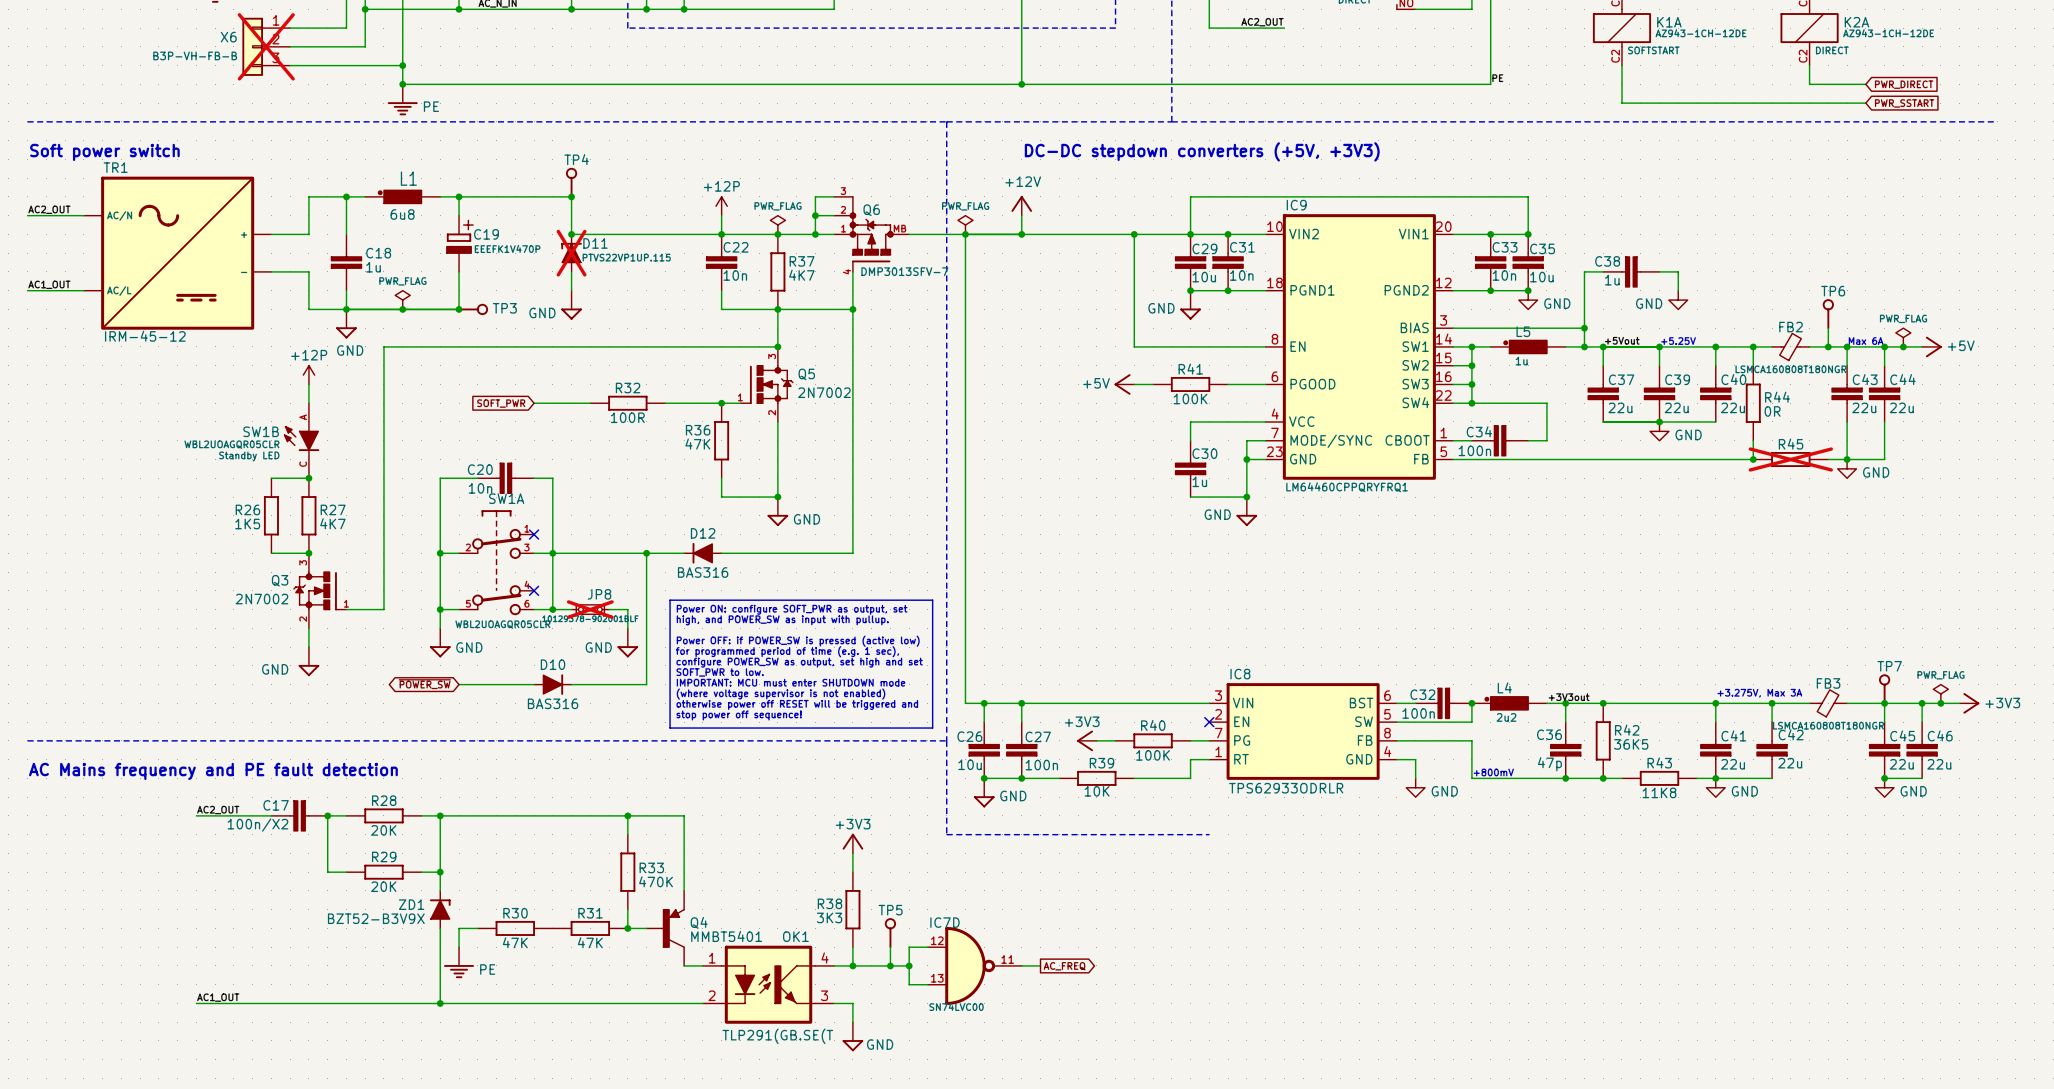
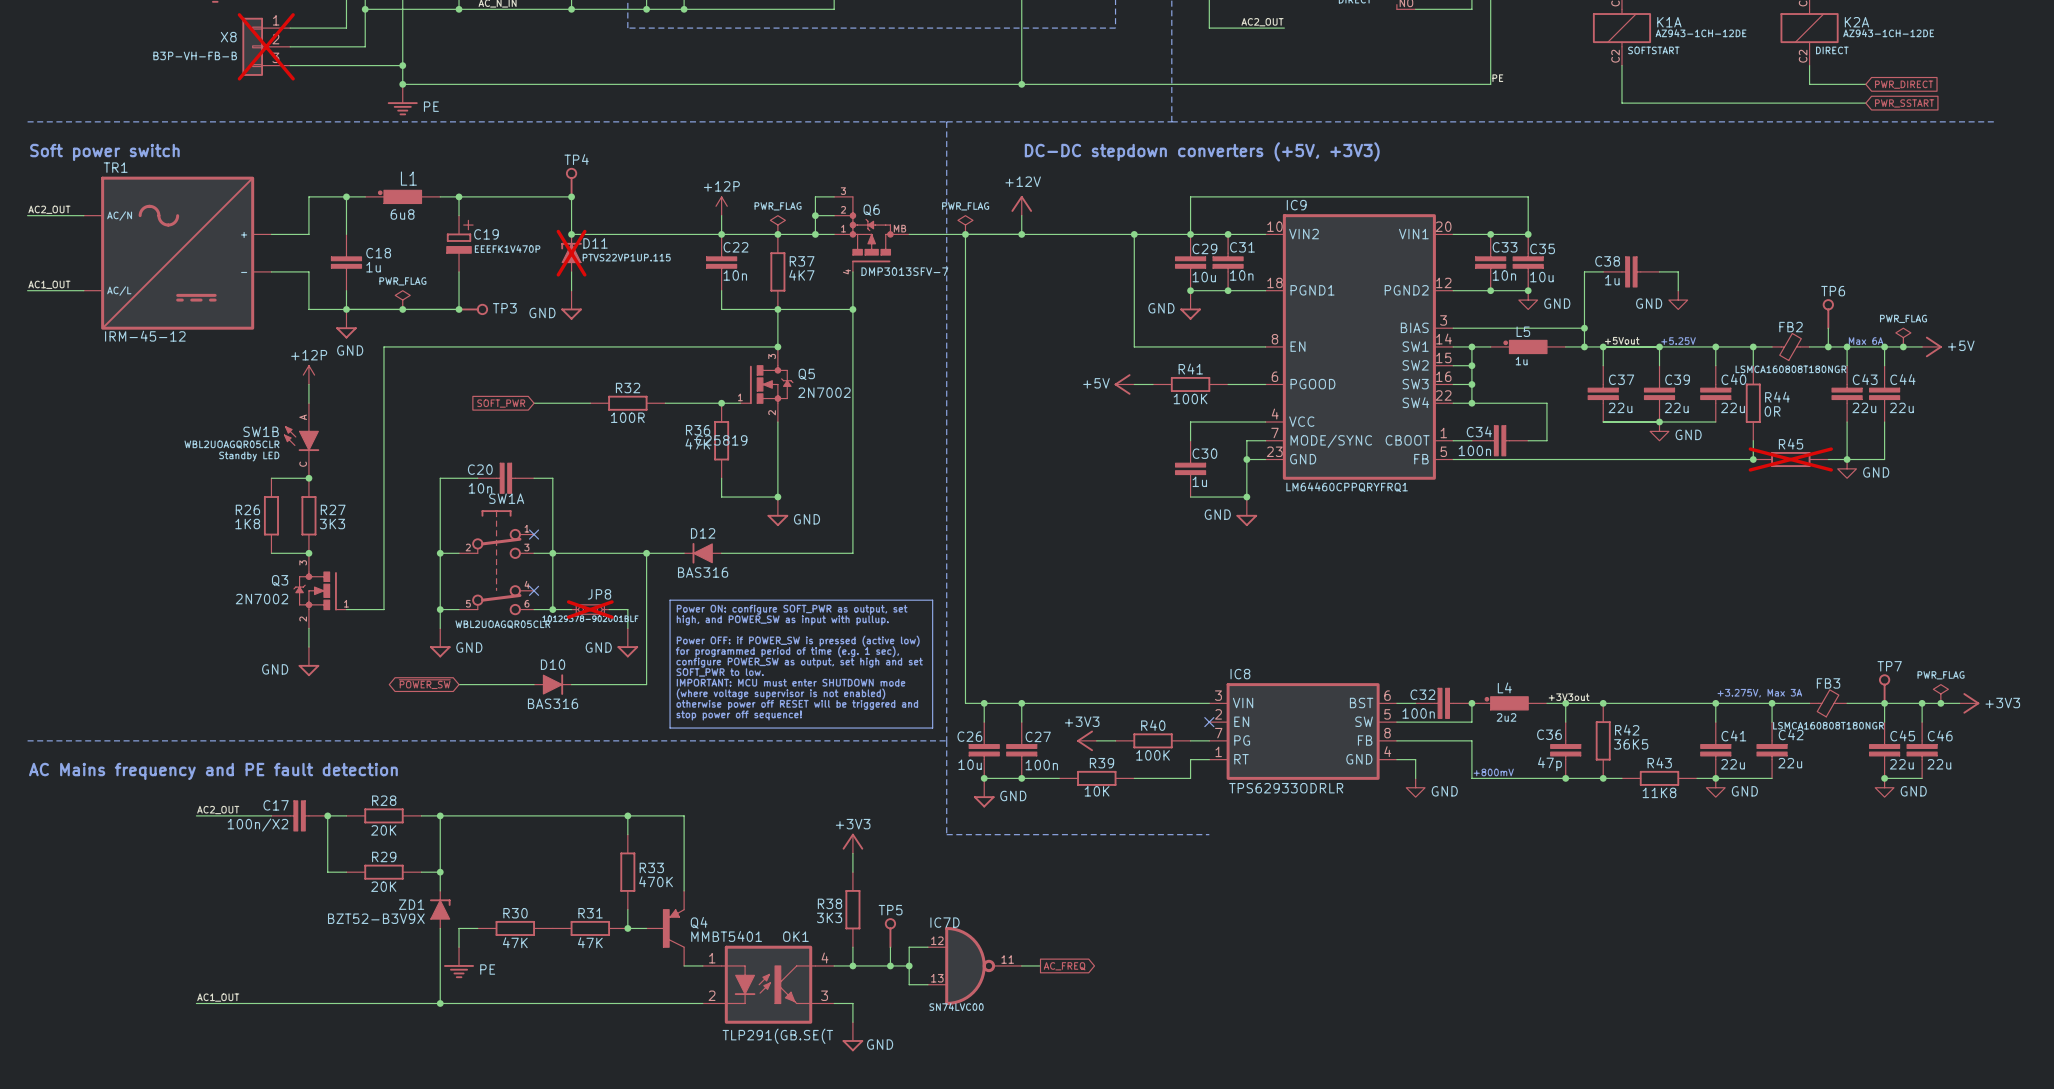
X6 name: X6 (228, 37) -> X8 (228, 37)
R36 text: none -> C25819 (721, 440)
R27 value: 4K7 (332, 523) -> 3K3 (332, 524)
R26 value: 1K5 (247, 524) -> 1K8 (247, 524)

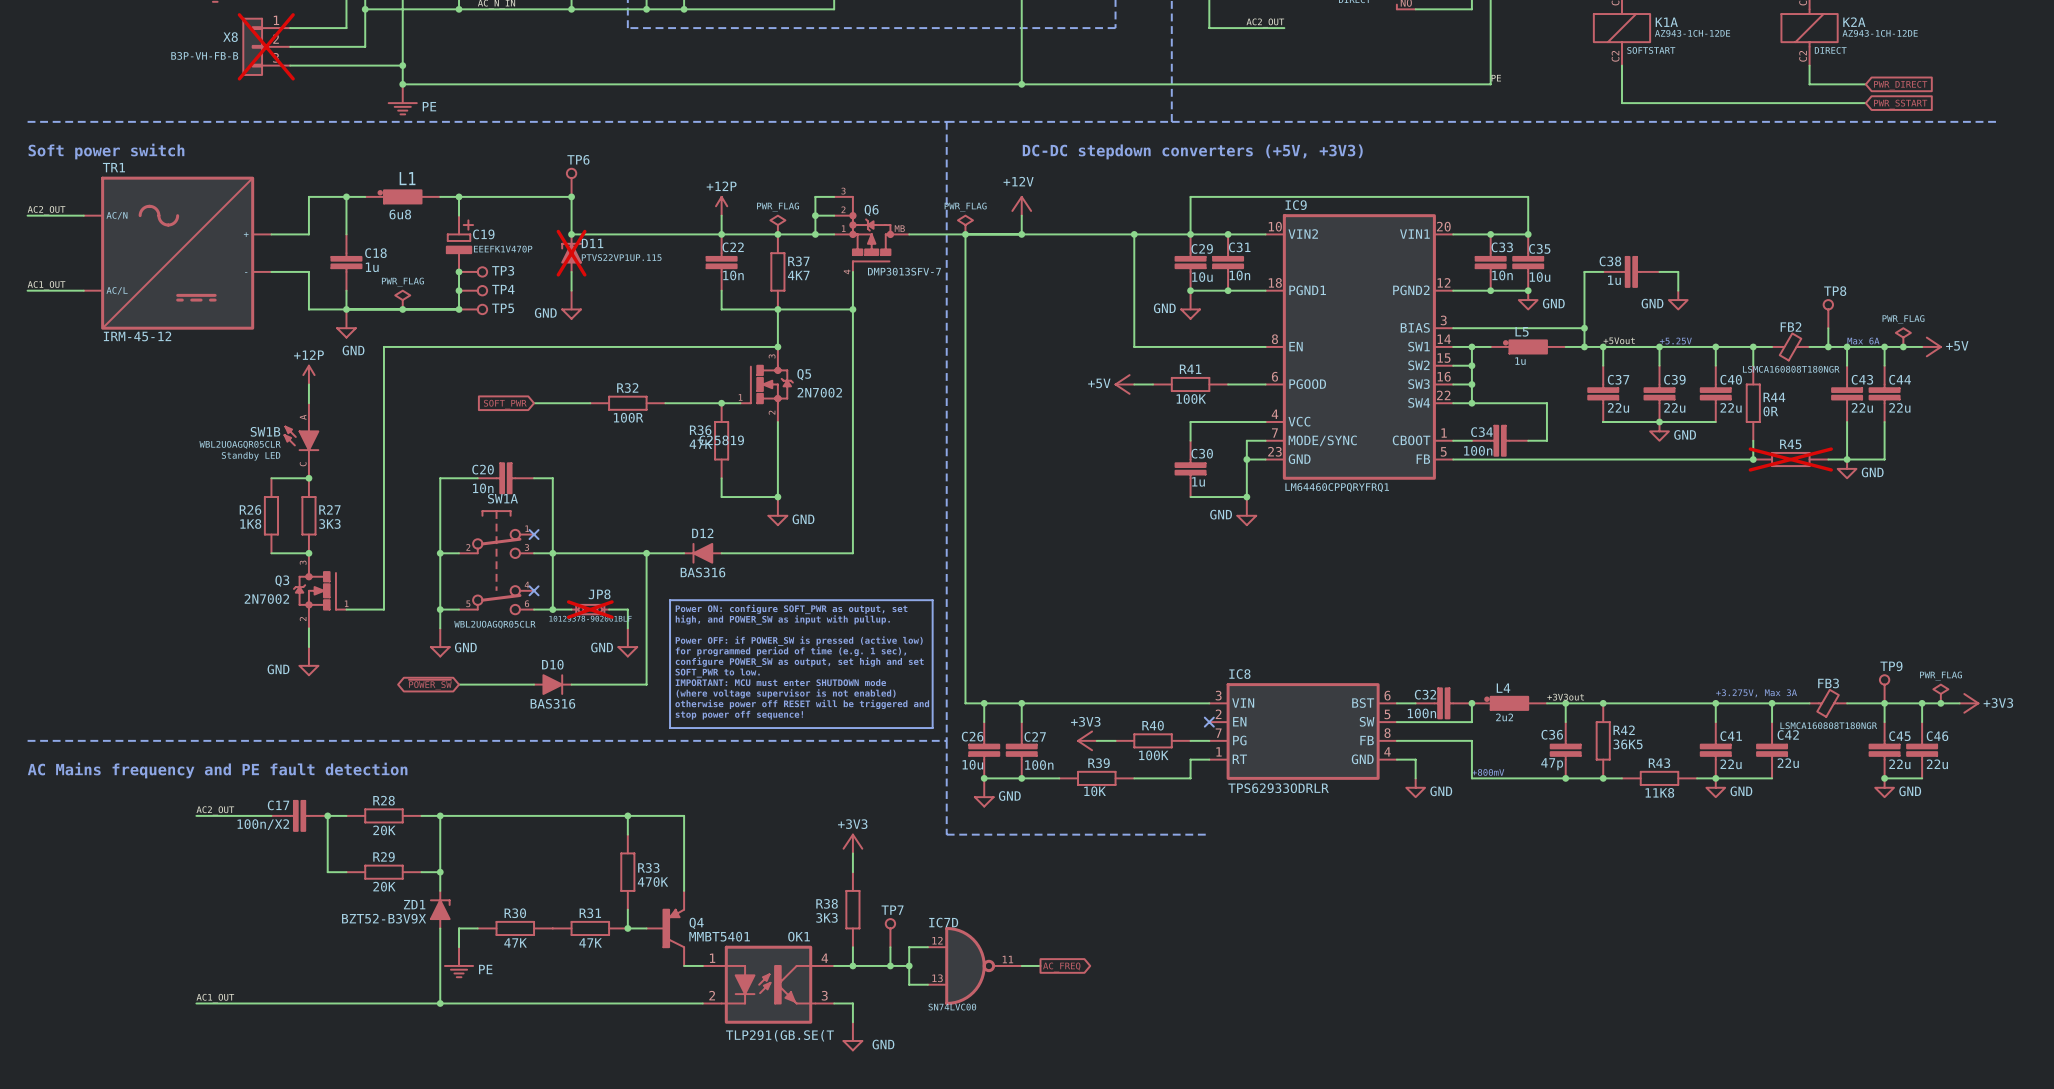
TP4 name: TP4 (576, 159) -> TP6 (578, 159)
junction: none -> (459, 271)
TP3: none -> (473, 271)
junction: none -> (459, 290)
TP4: none -> (473, 290)
TP6 name: TP6 (1833, 291) -> TP8 (1835, 291)
TP3 name: TP3 (504, 308) -> TP5 (503, 308)
TP7 name: TP7 (1889, 666) -> TP9 (1891, 666)
TP5 name: TP5 (890, 910) -> TP7 (892, 910)

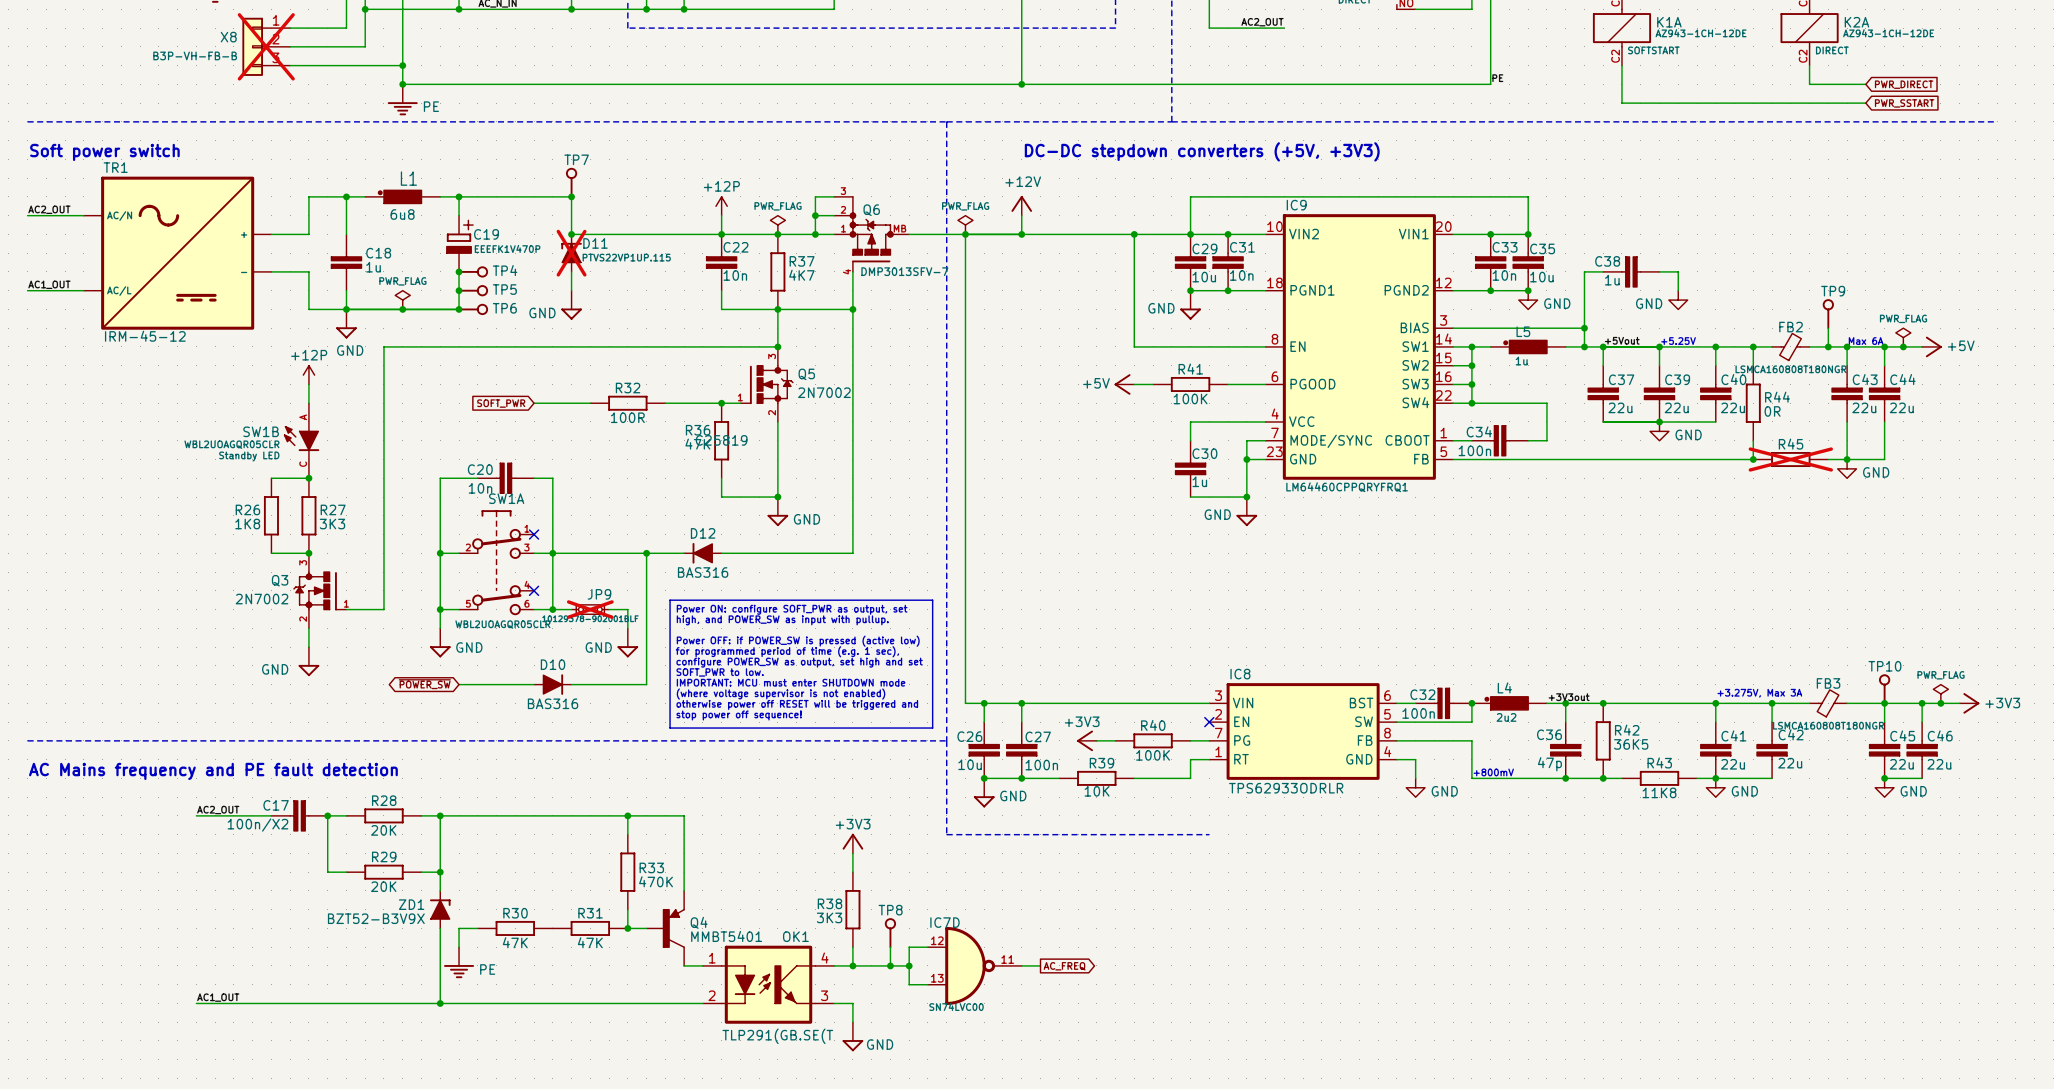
TP6 name: TP6 (578, 159) -> TP7 (576, 159)
TP3 name: TP3 (503, 270) -> TP4 (505, 270)
TP4 name: TP4 (503, 289) -> TP5 (504, 289)
TP8 name: TP8 (1835, 291) -> TP9 (1833, 291)
TP5 name: TP5 (503, 308) -> TP6 (504, 308)
JP8 name: JP8 (599, 594) -> JP9 (599, 594)
TP9 name: TP9 (1891, 666) -> TP10 (1884, 666)
TP7 name: TP7 (892, 910) -> TP8 (890, 910)

